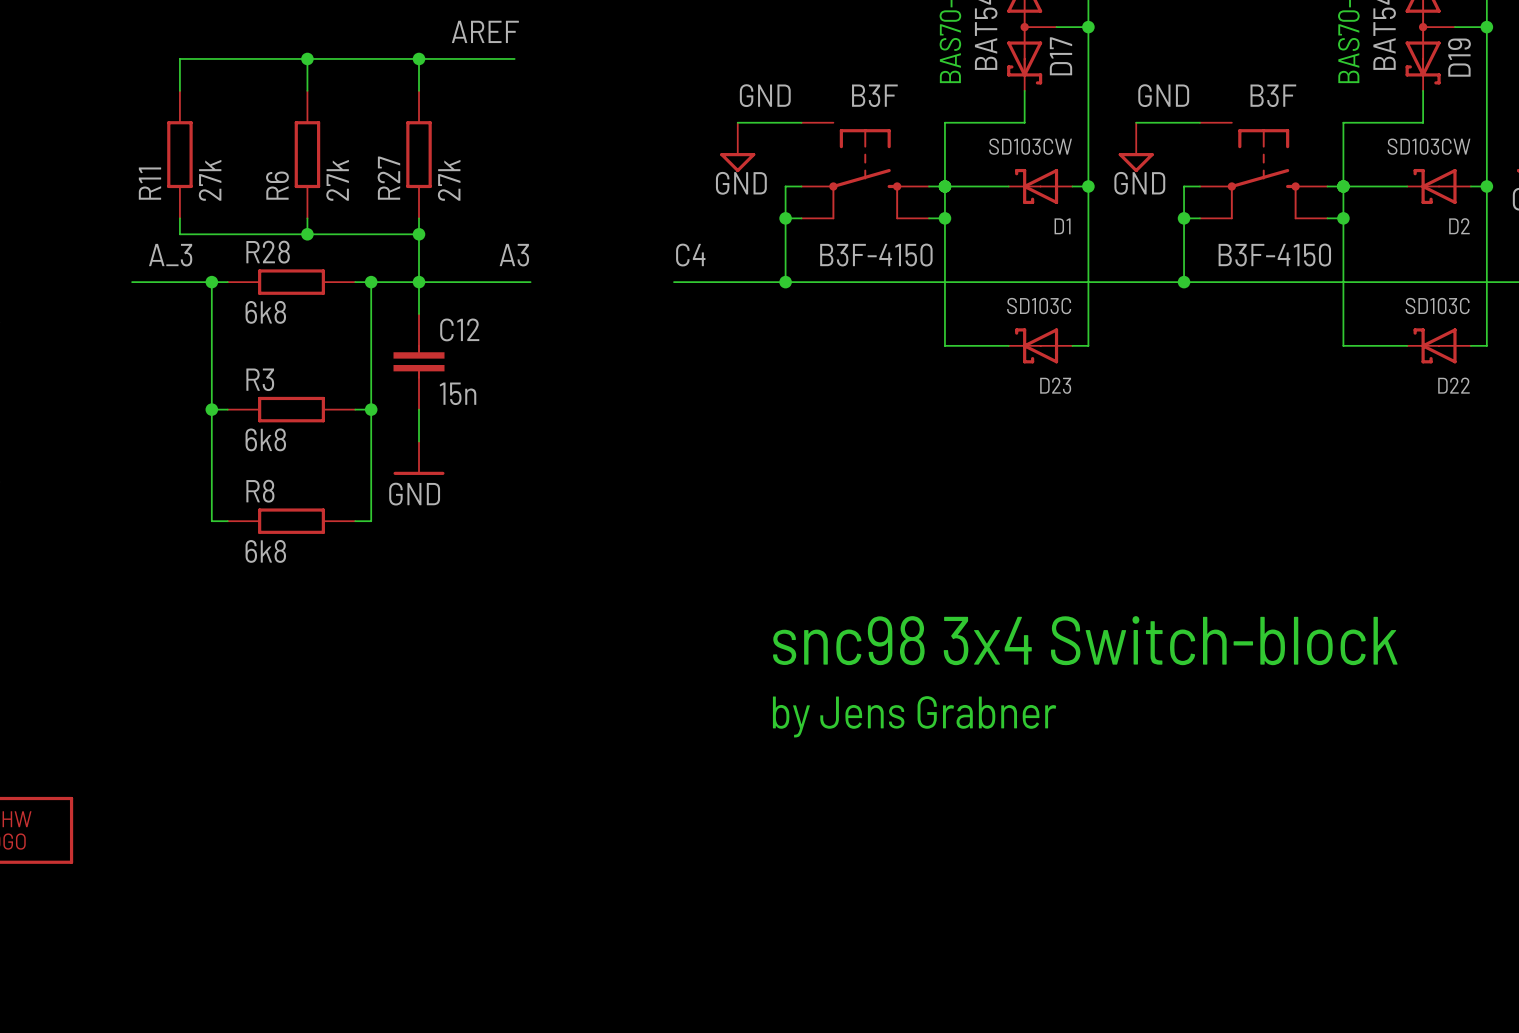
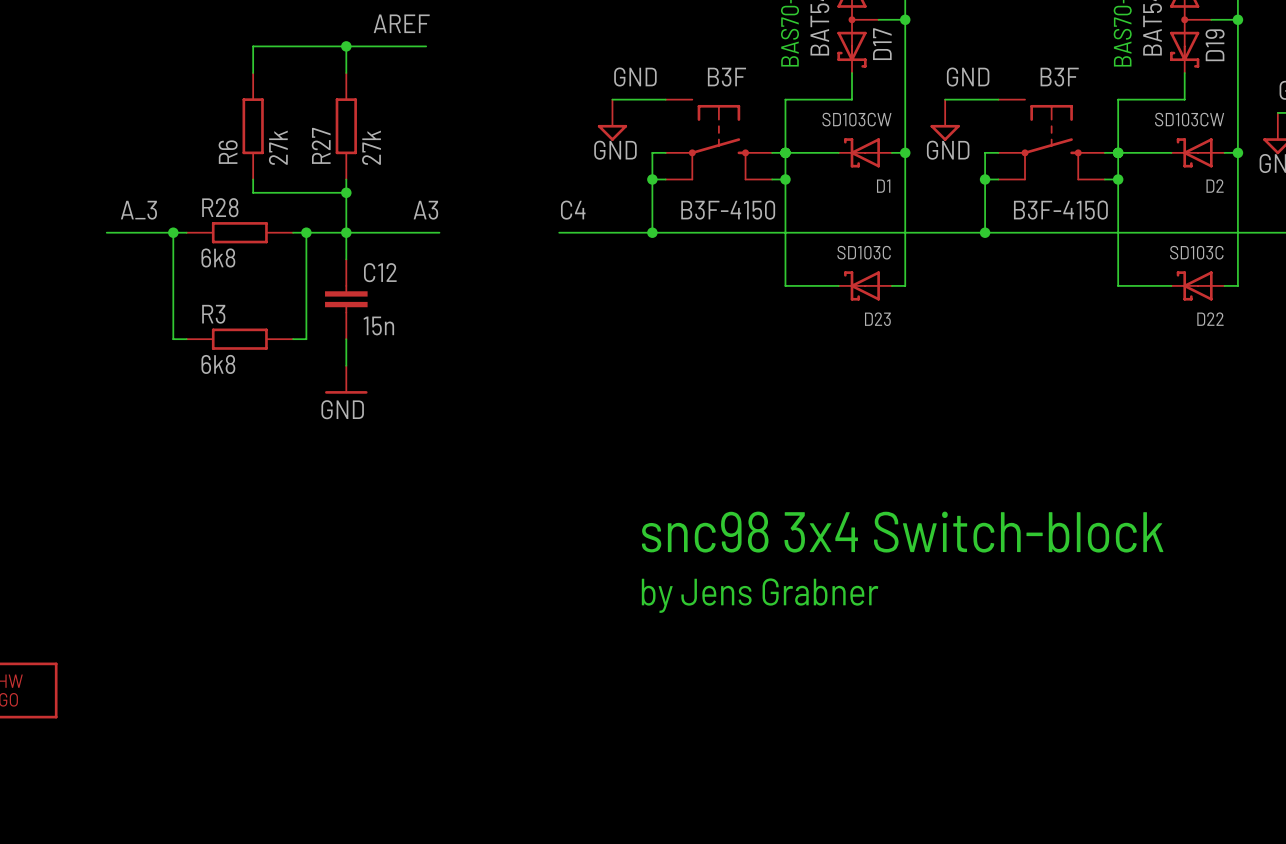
wire: (307, 58) (179, 58) (179, 90) -> none
junction: (307, 58) -> none
R11: 27k (179, 154) -> none
wire: (179, 218) (179, 234) (307, 234) -> none
junction: (307, 234) -> none
wire: (211, 409) (211, 521) (227, 521) -> none
junction: (211, 409) -> none
wire: (371, 409) (371, 521) (355, 521) -> none
junction: (371, 409) -> none
R8: 6k8 (291, 521) -> none

